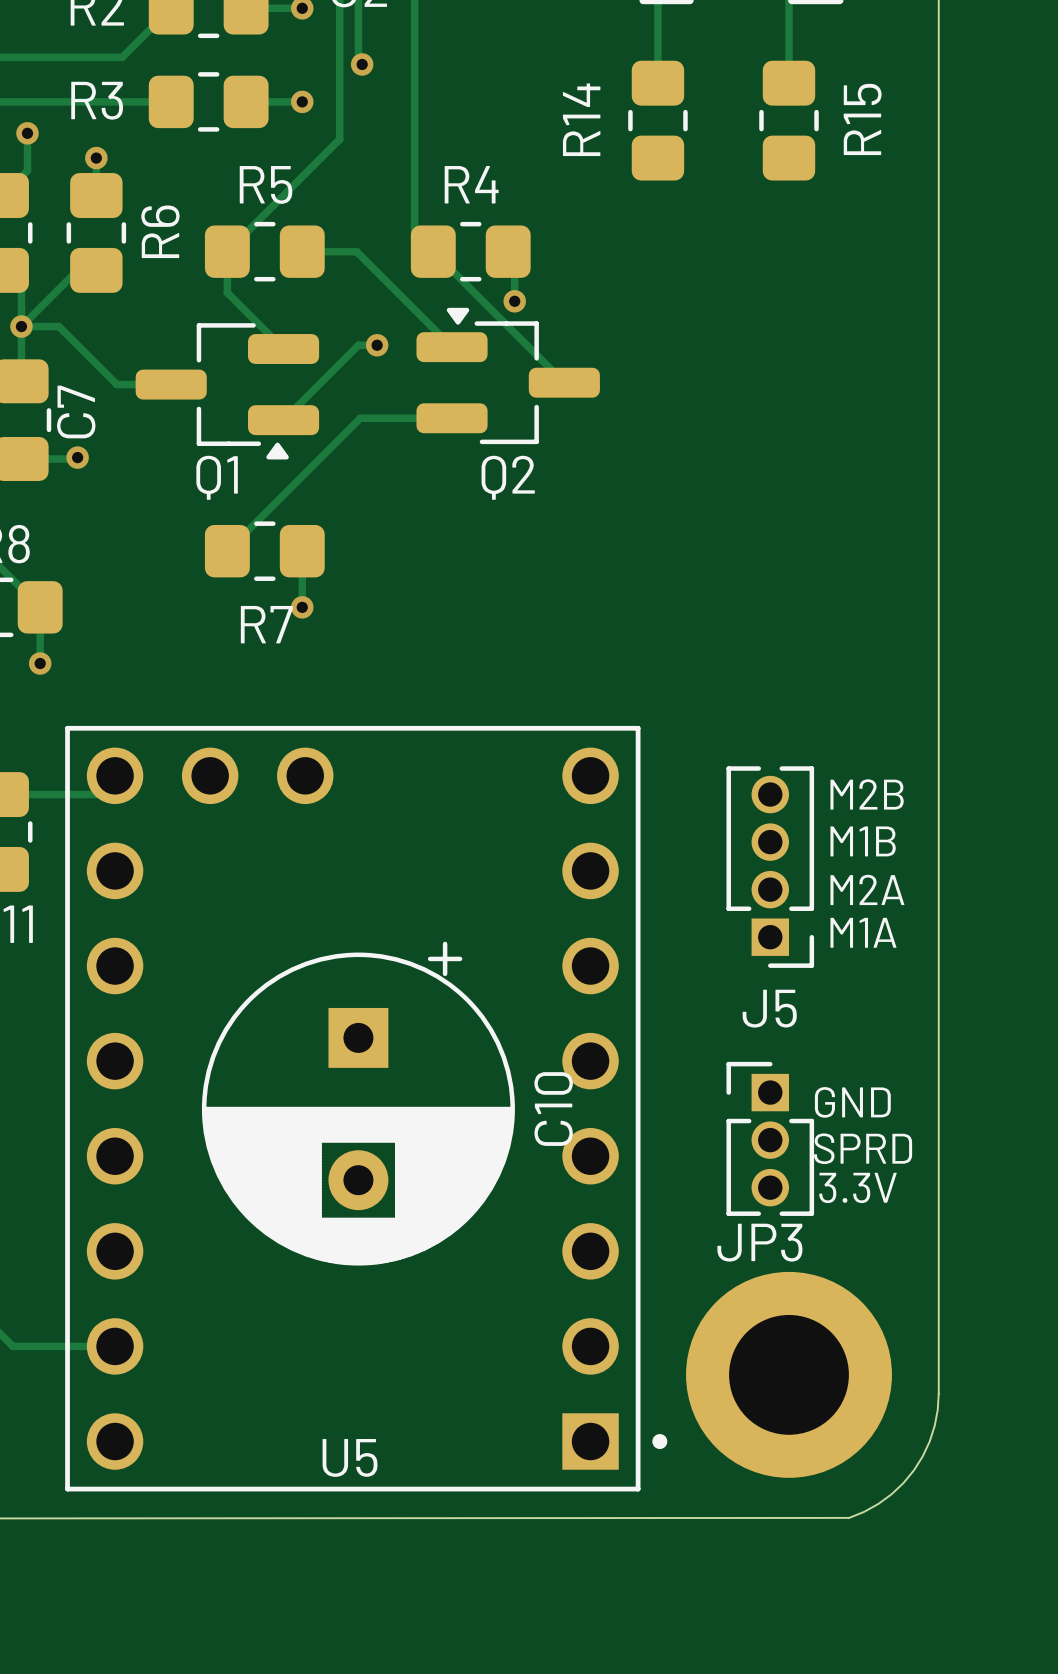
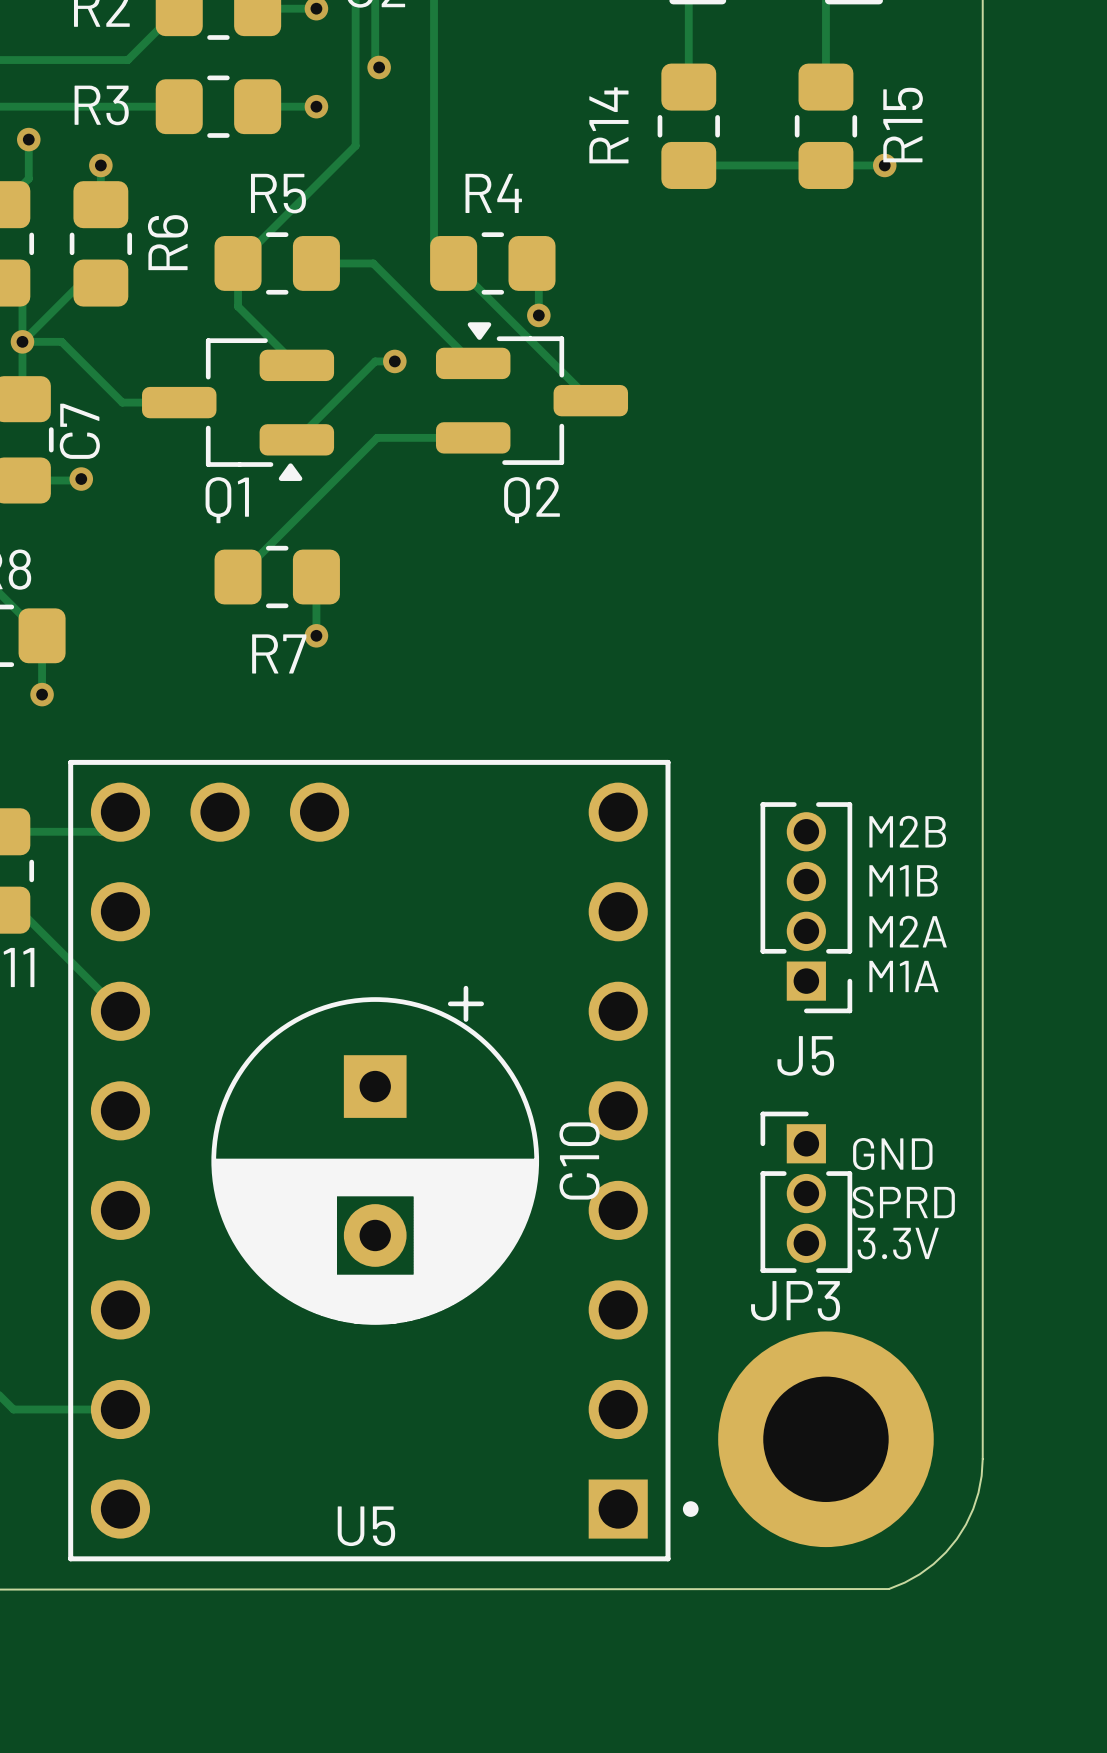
track: none -> (688, 165) (884, 165)
via: none -> (884, 165)
track: none -> (19, 910) (120, 1011)

